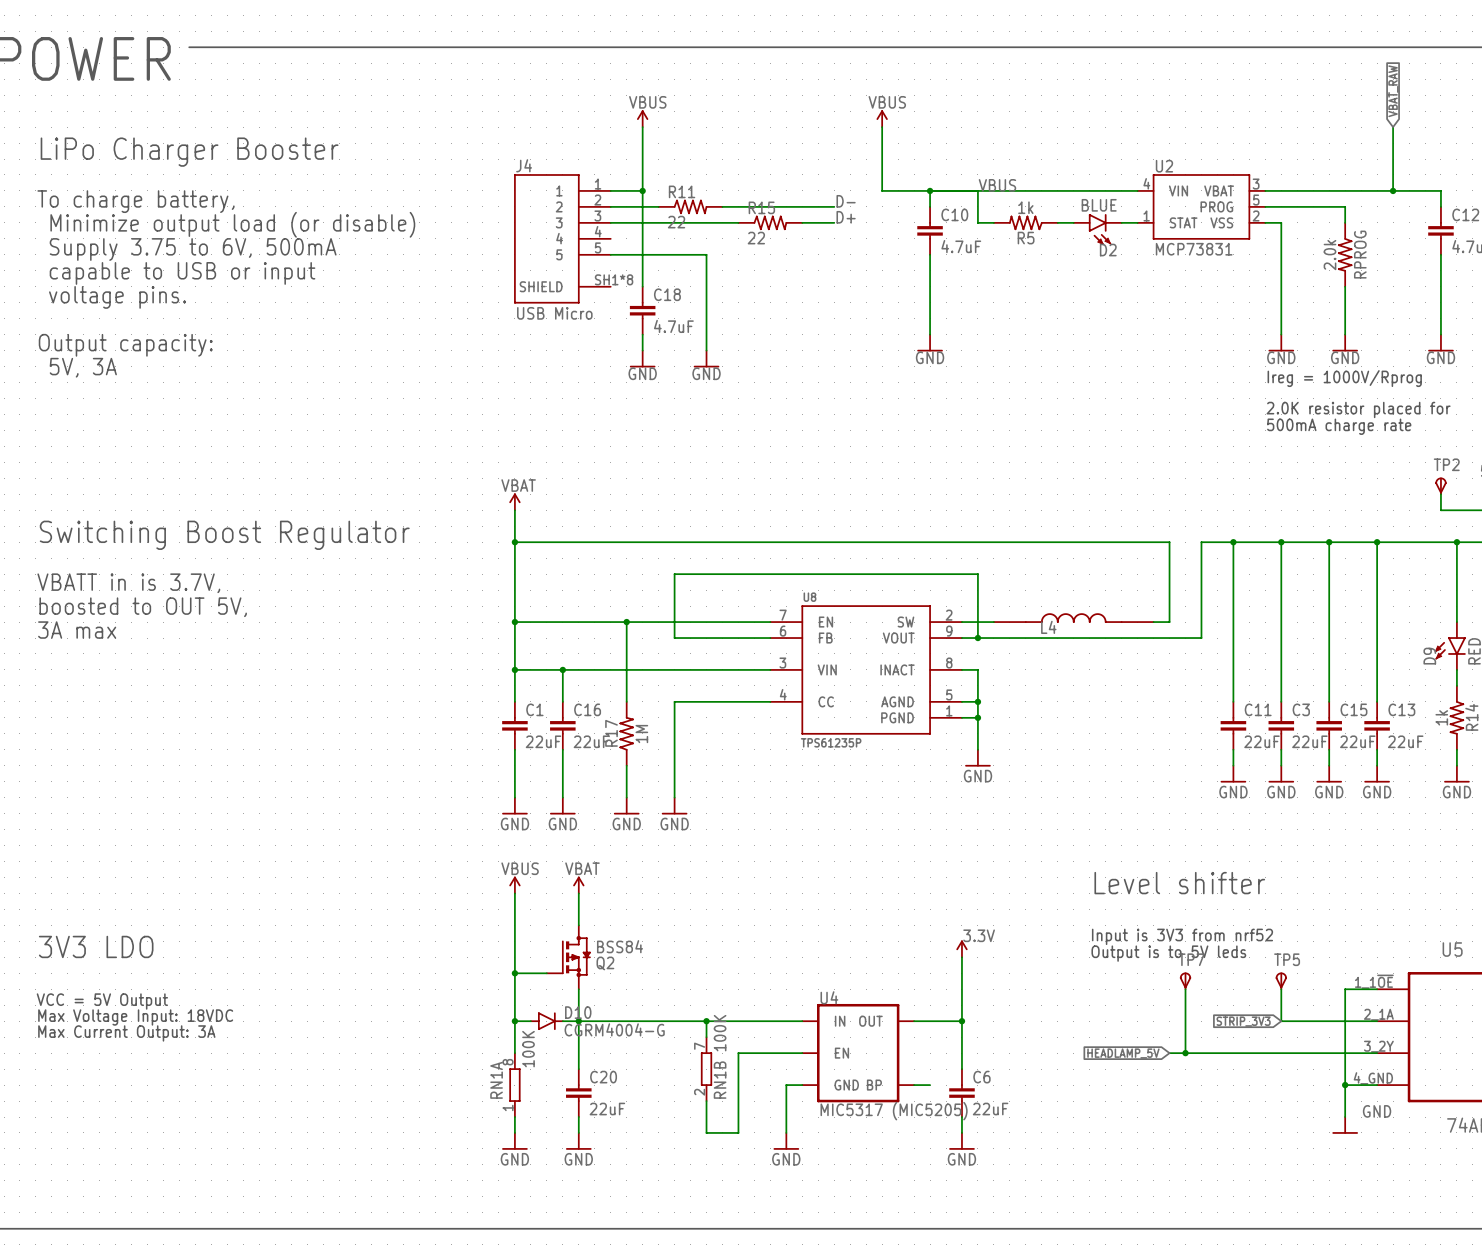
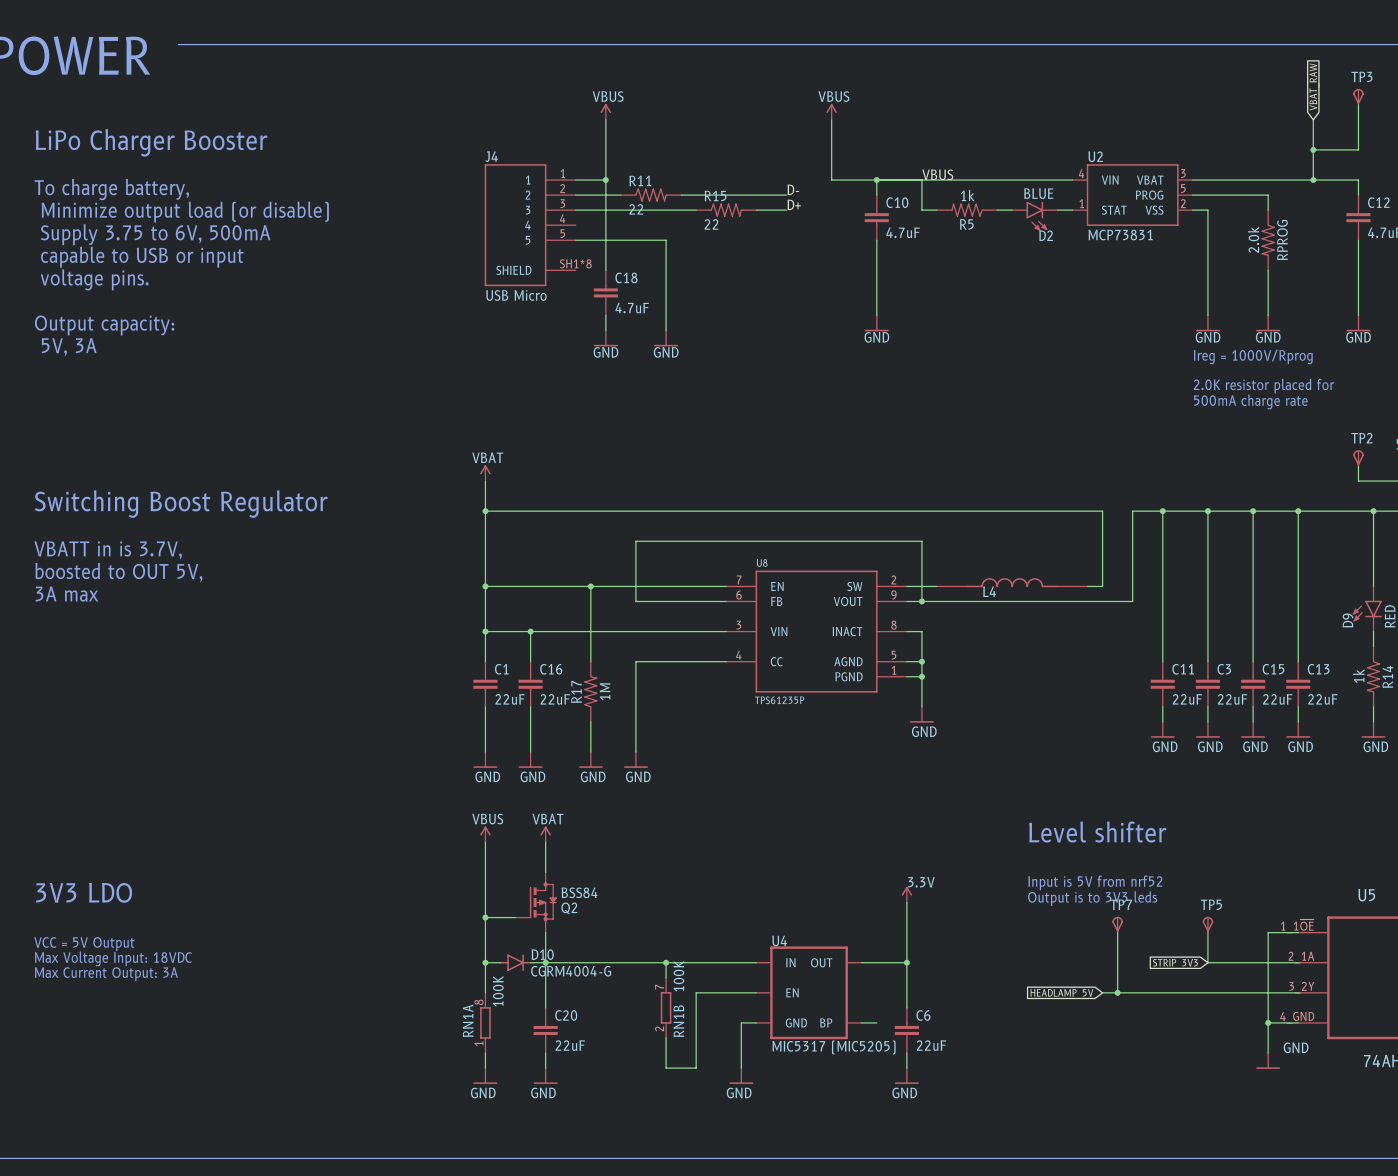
TP3: none -> (1358, 96)
wire: none -> (1358, 104) (1358, 149) (1313, 149)
junction: none -> (1313, 149)
text: Input is 3V3 from nrf52 (1182, 936) -> Input is 5V from nrf52 (1095, 882)
text: Output is to 5V leds (1168, 953) -> Output is to 3V3 leds (1092, 898)

